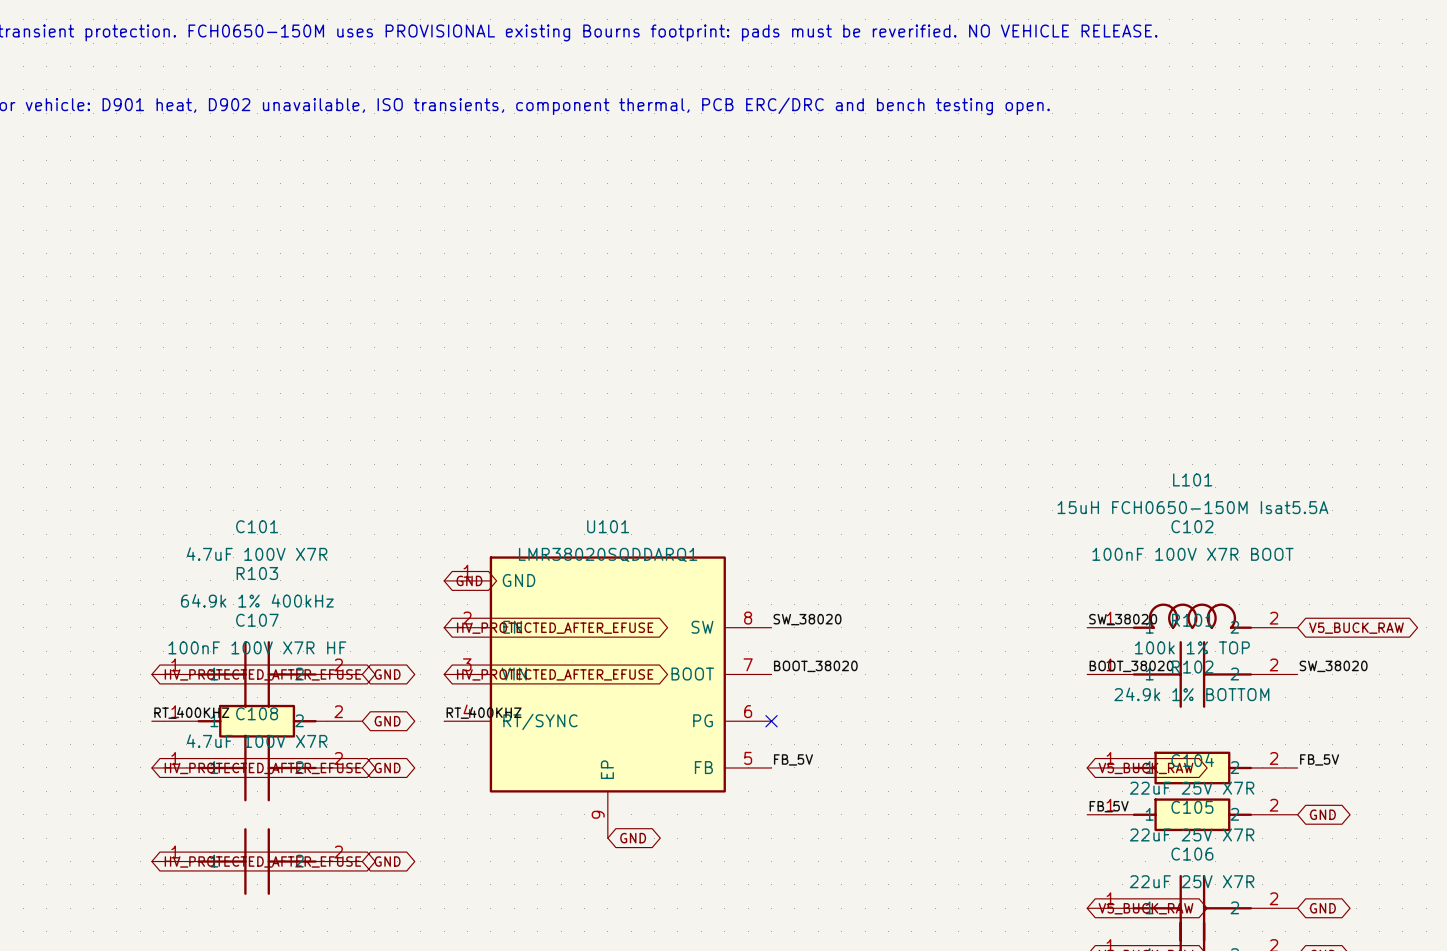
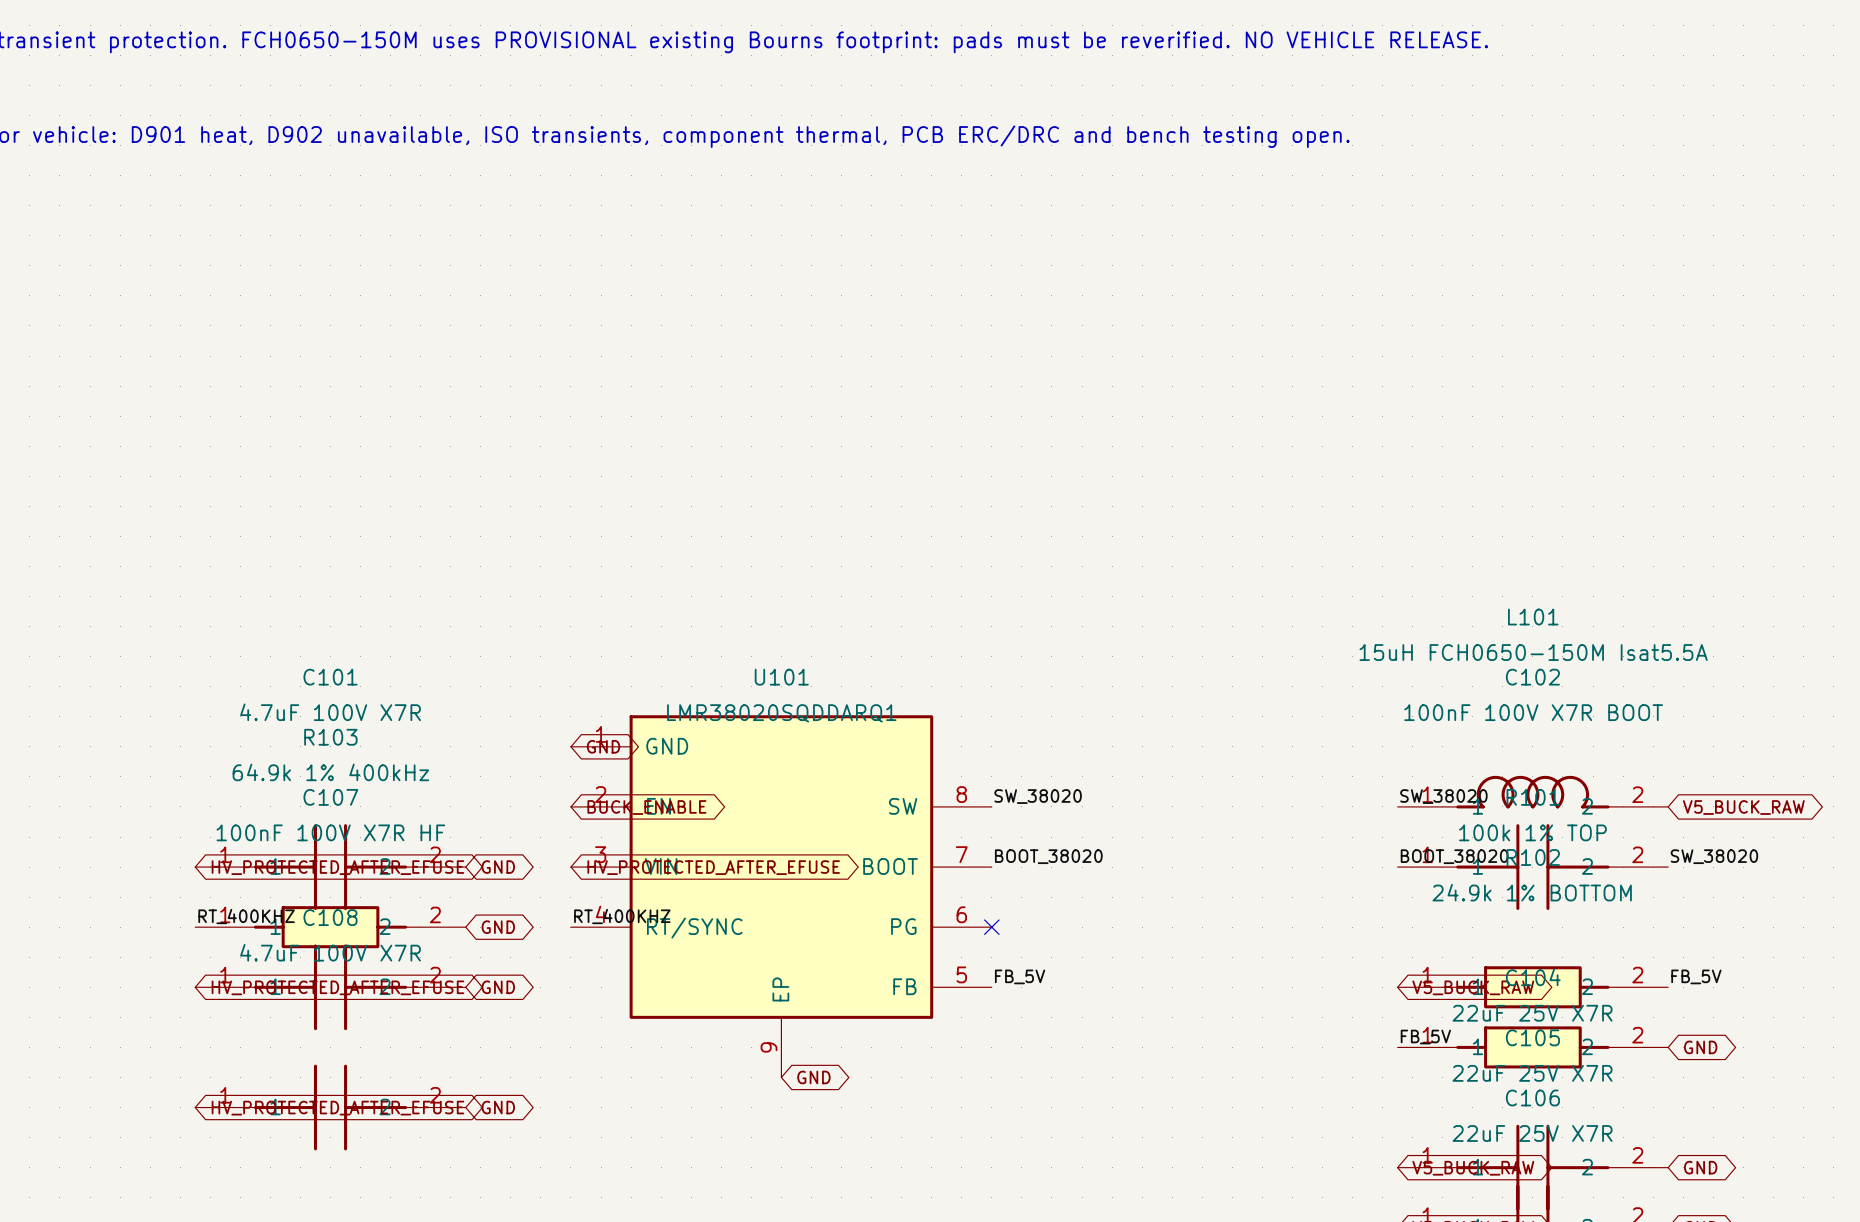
global label: HV_PROTECTED_AFTER_EFUSE (555, 628) -> BUCK_ENABLE (646, 807)

